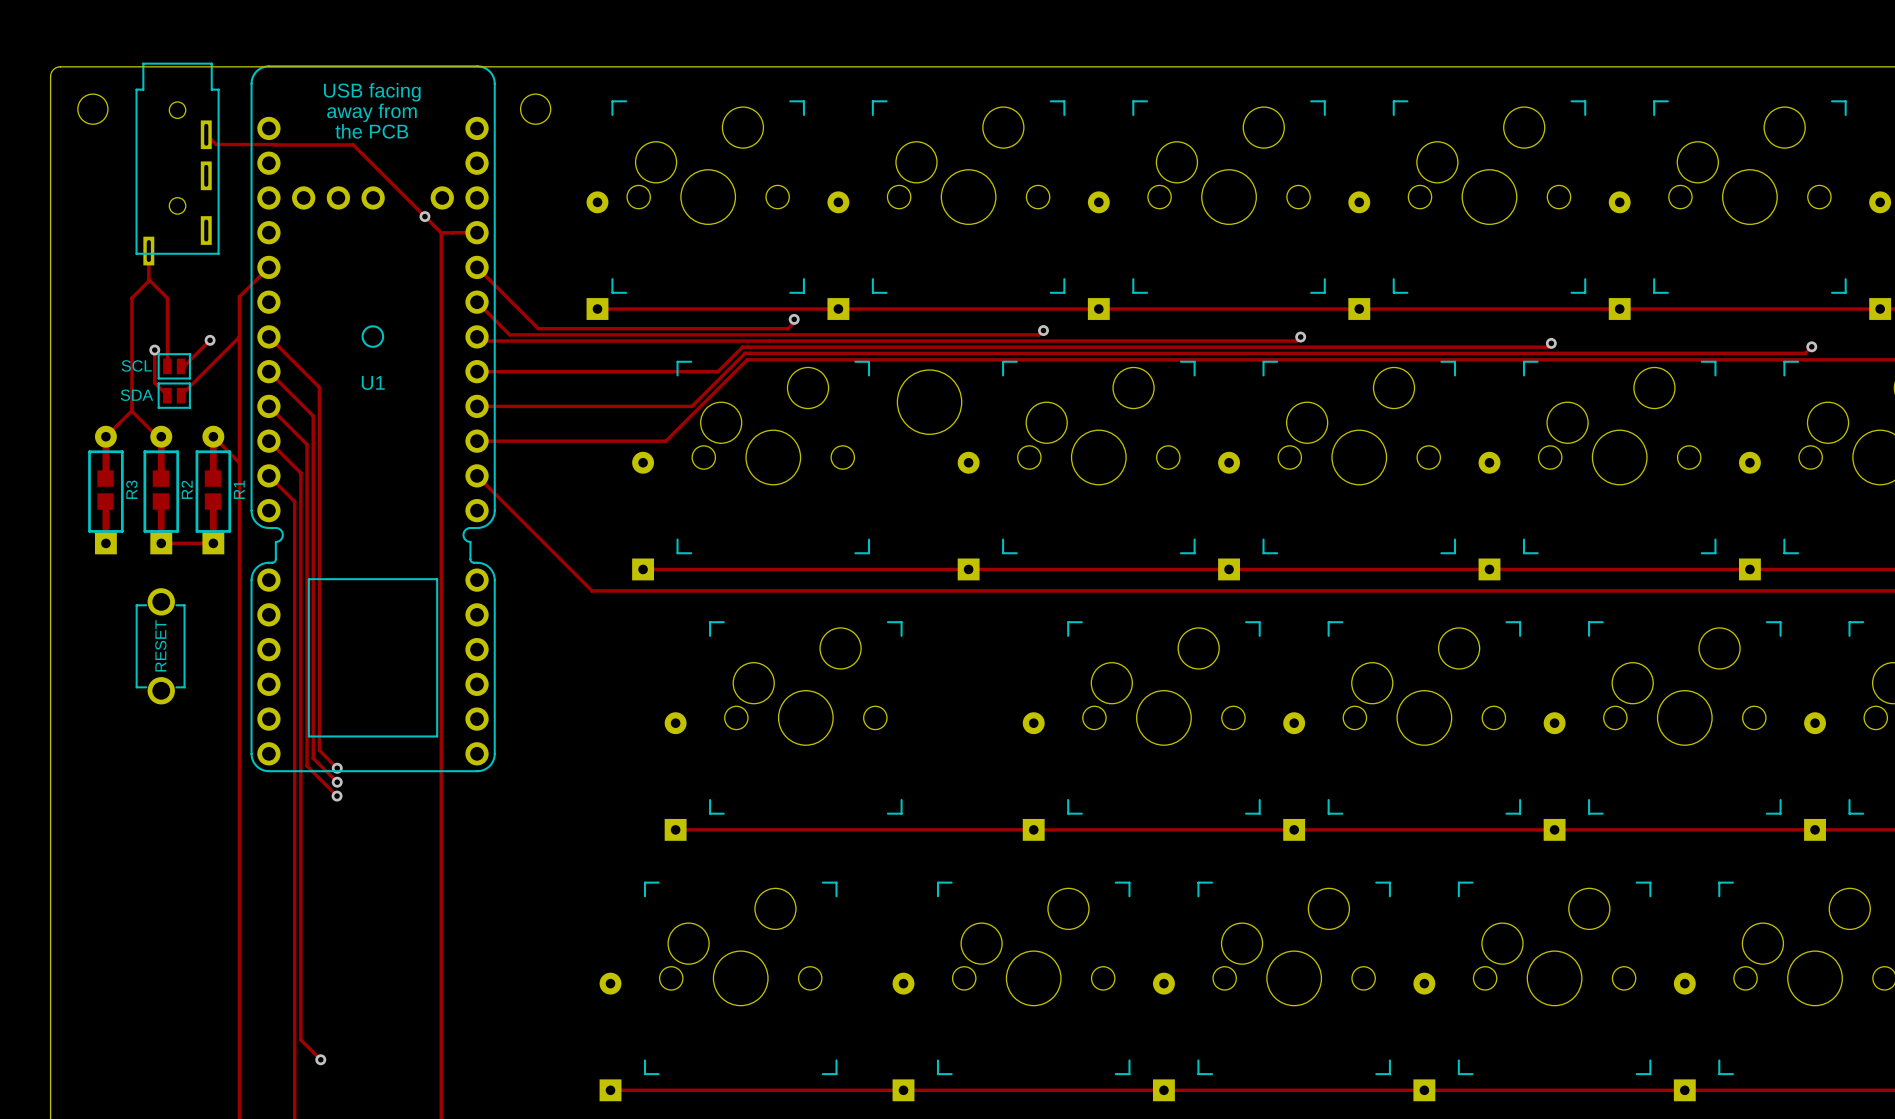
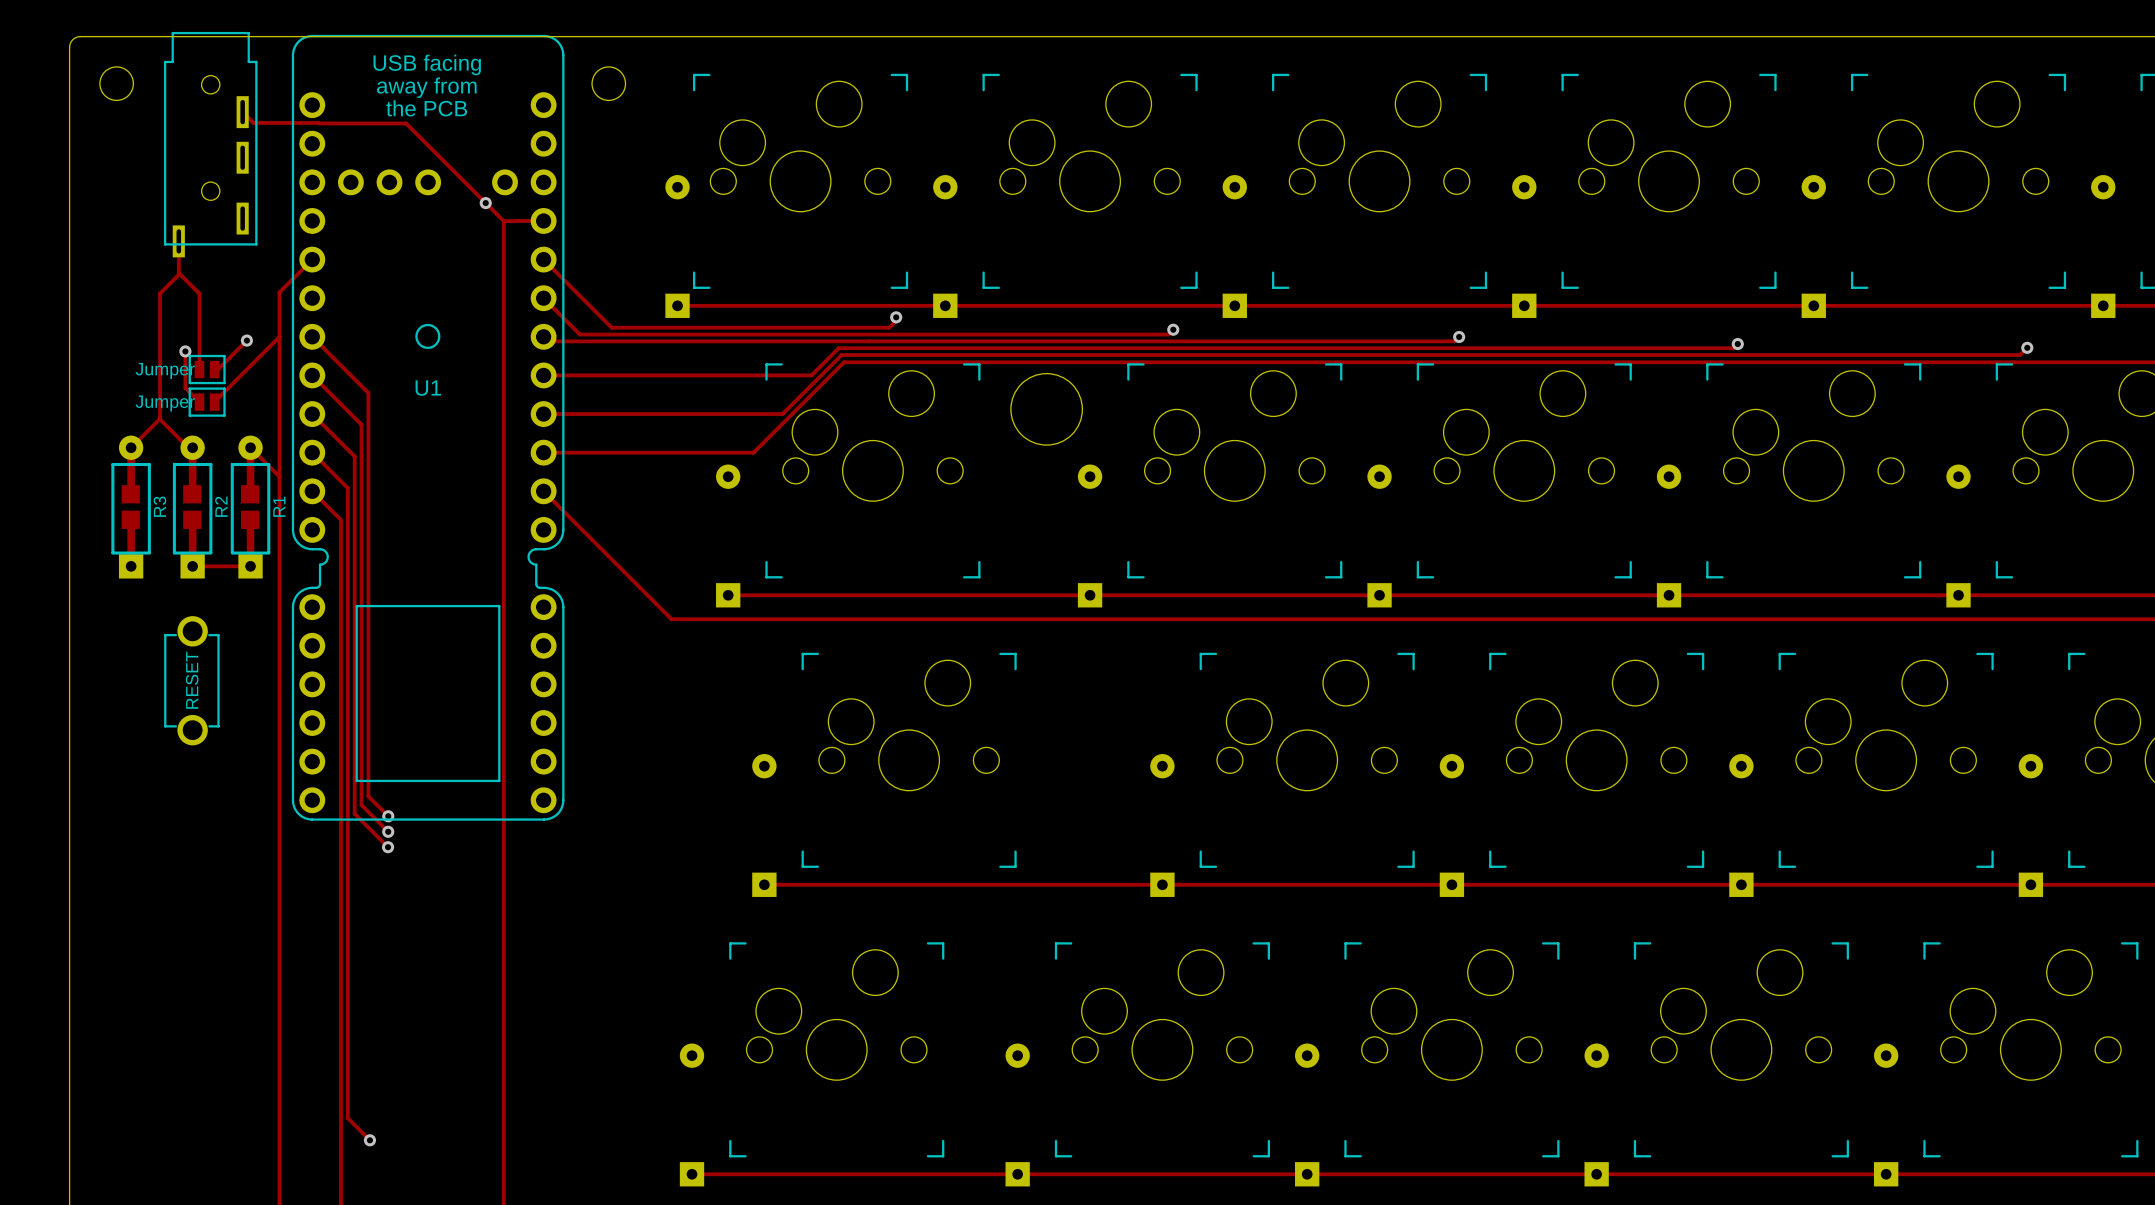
part value: SCL (136, 365) -> Jumper (165, 370)
part value: SDA (136, 395) -> Jumper (165, 403)

